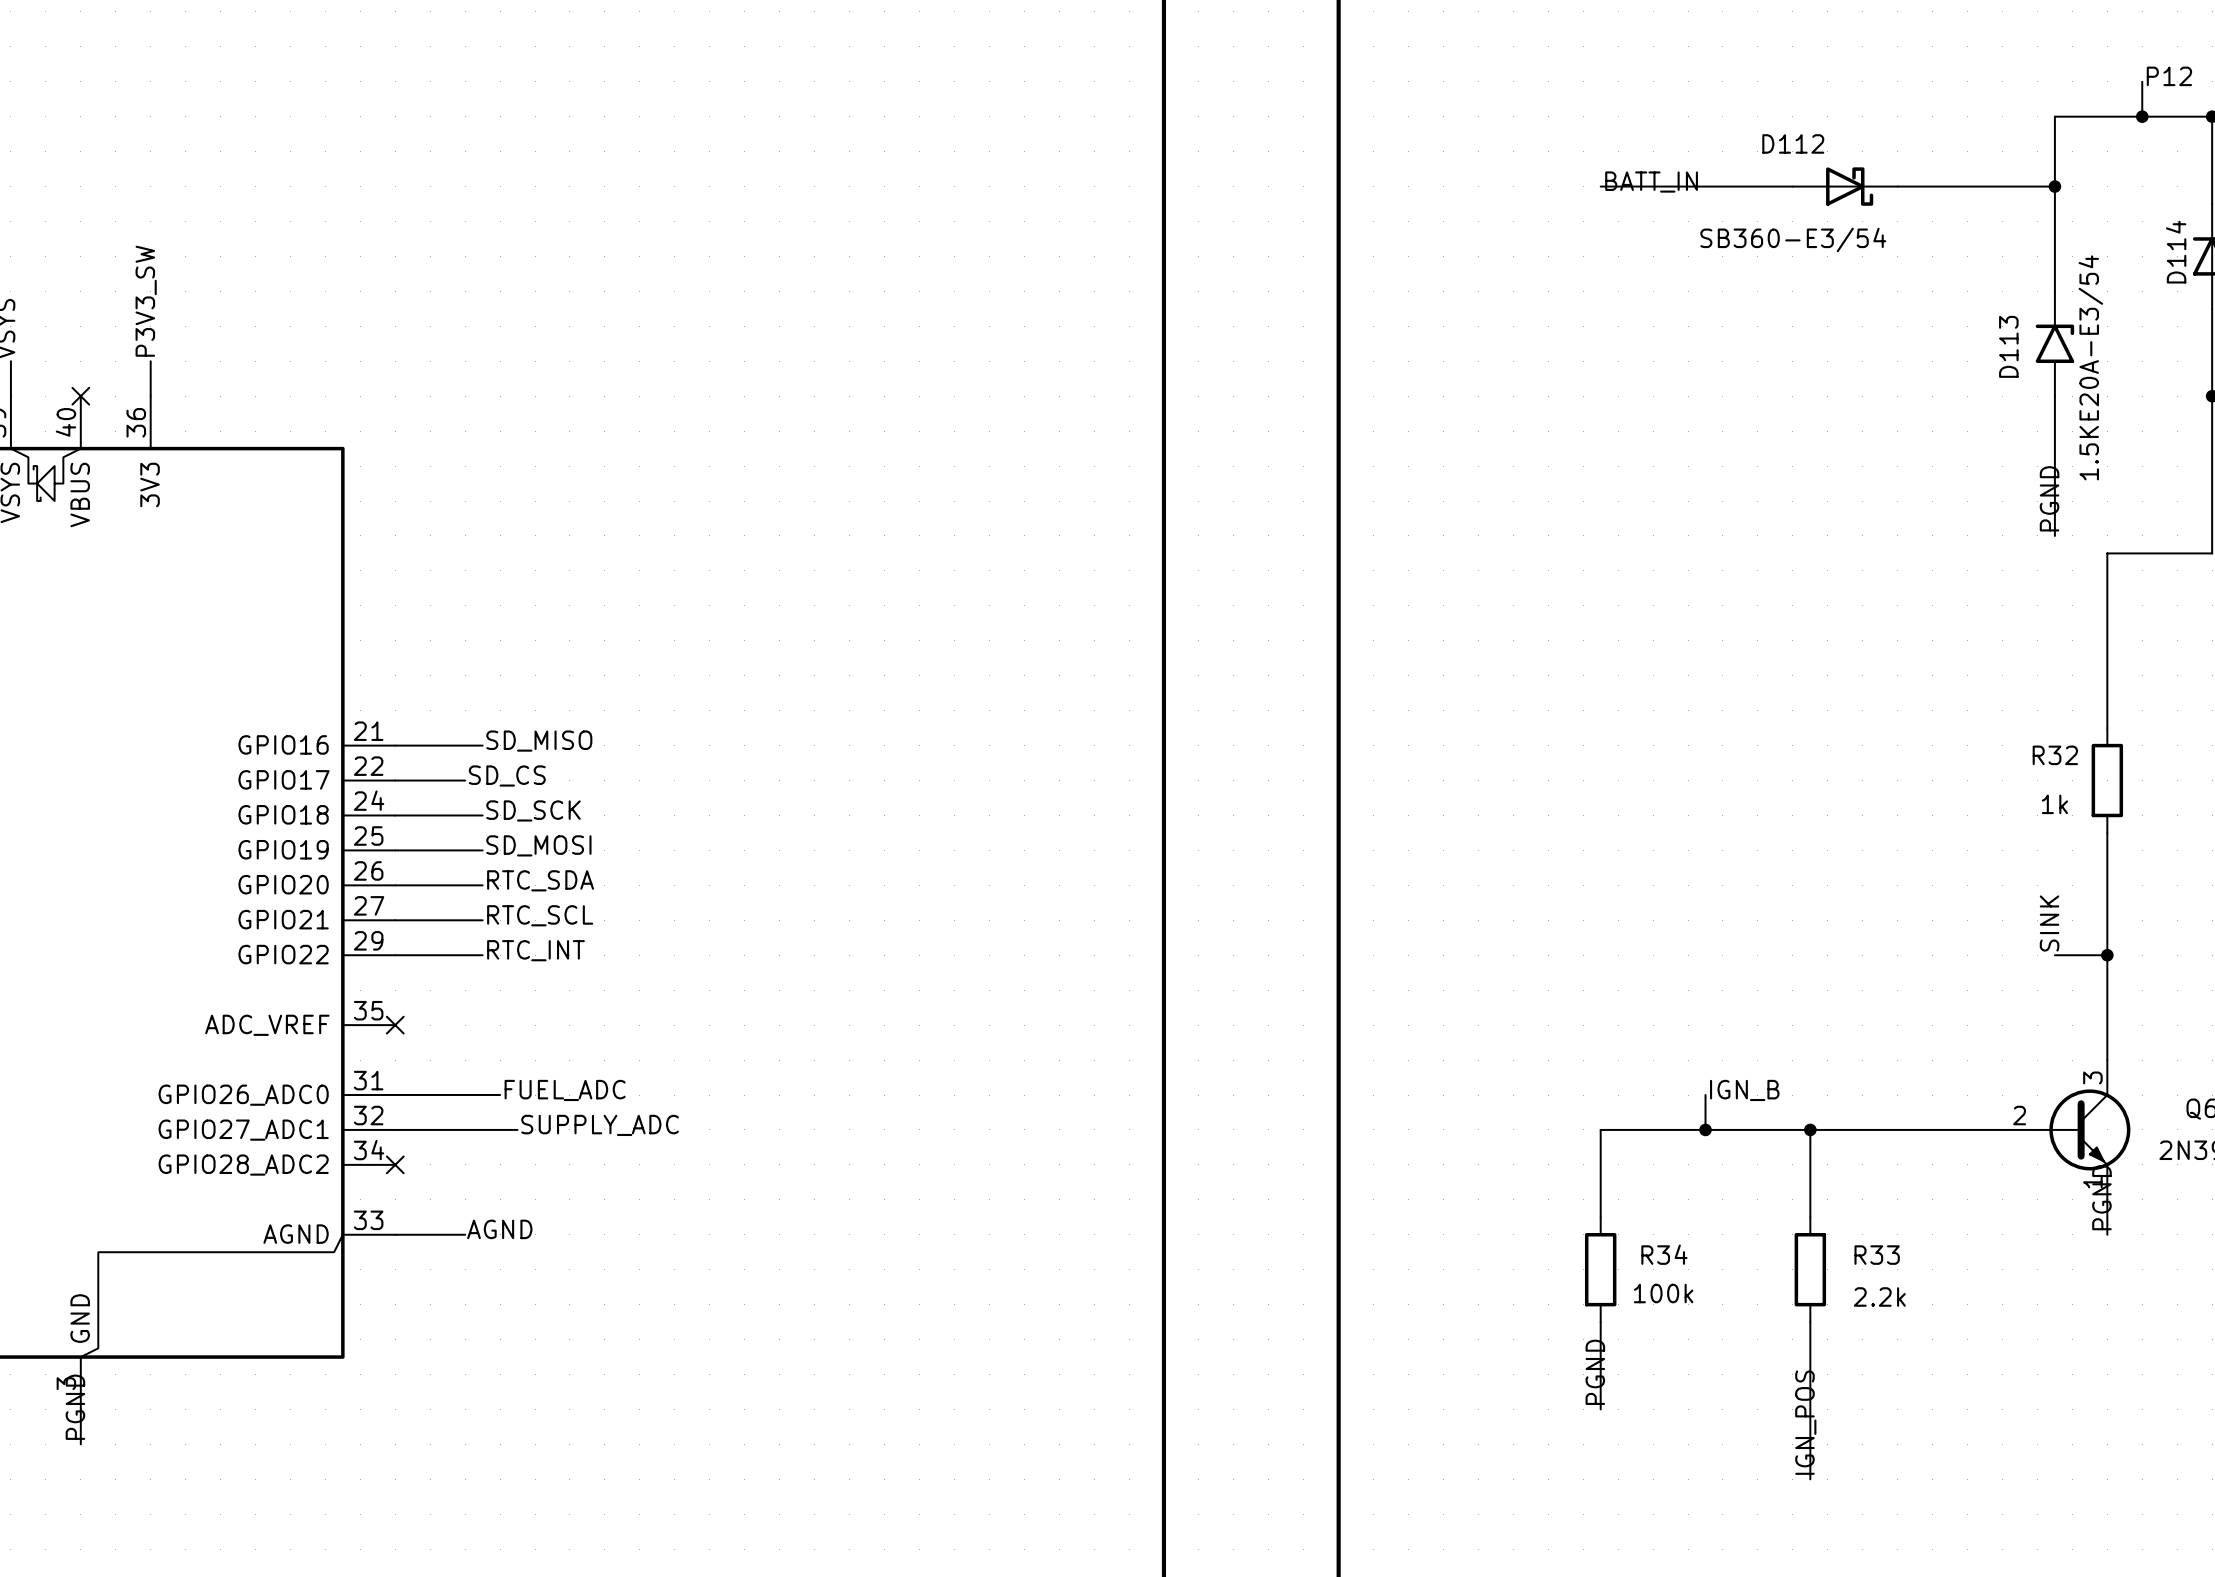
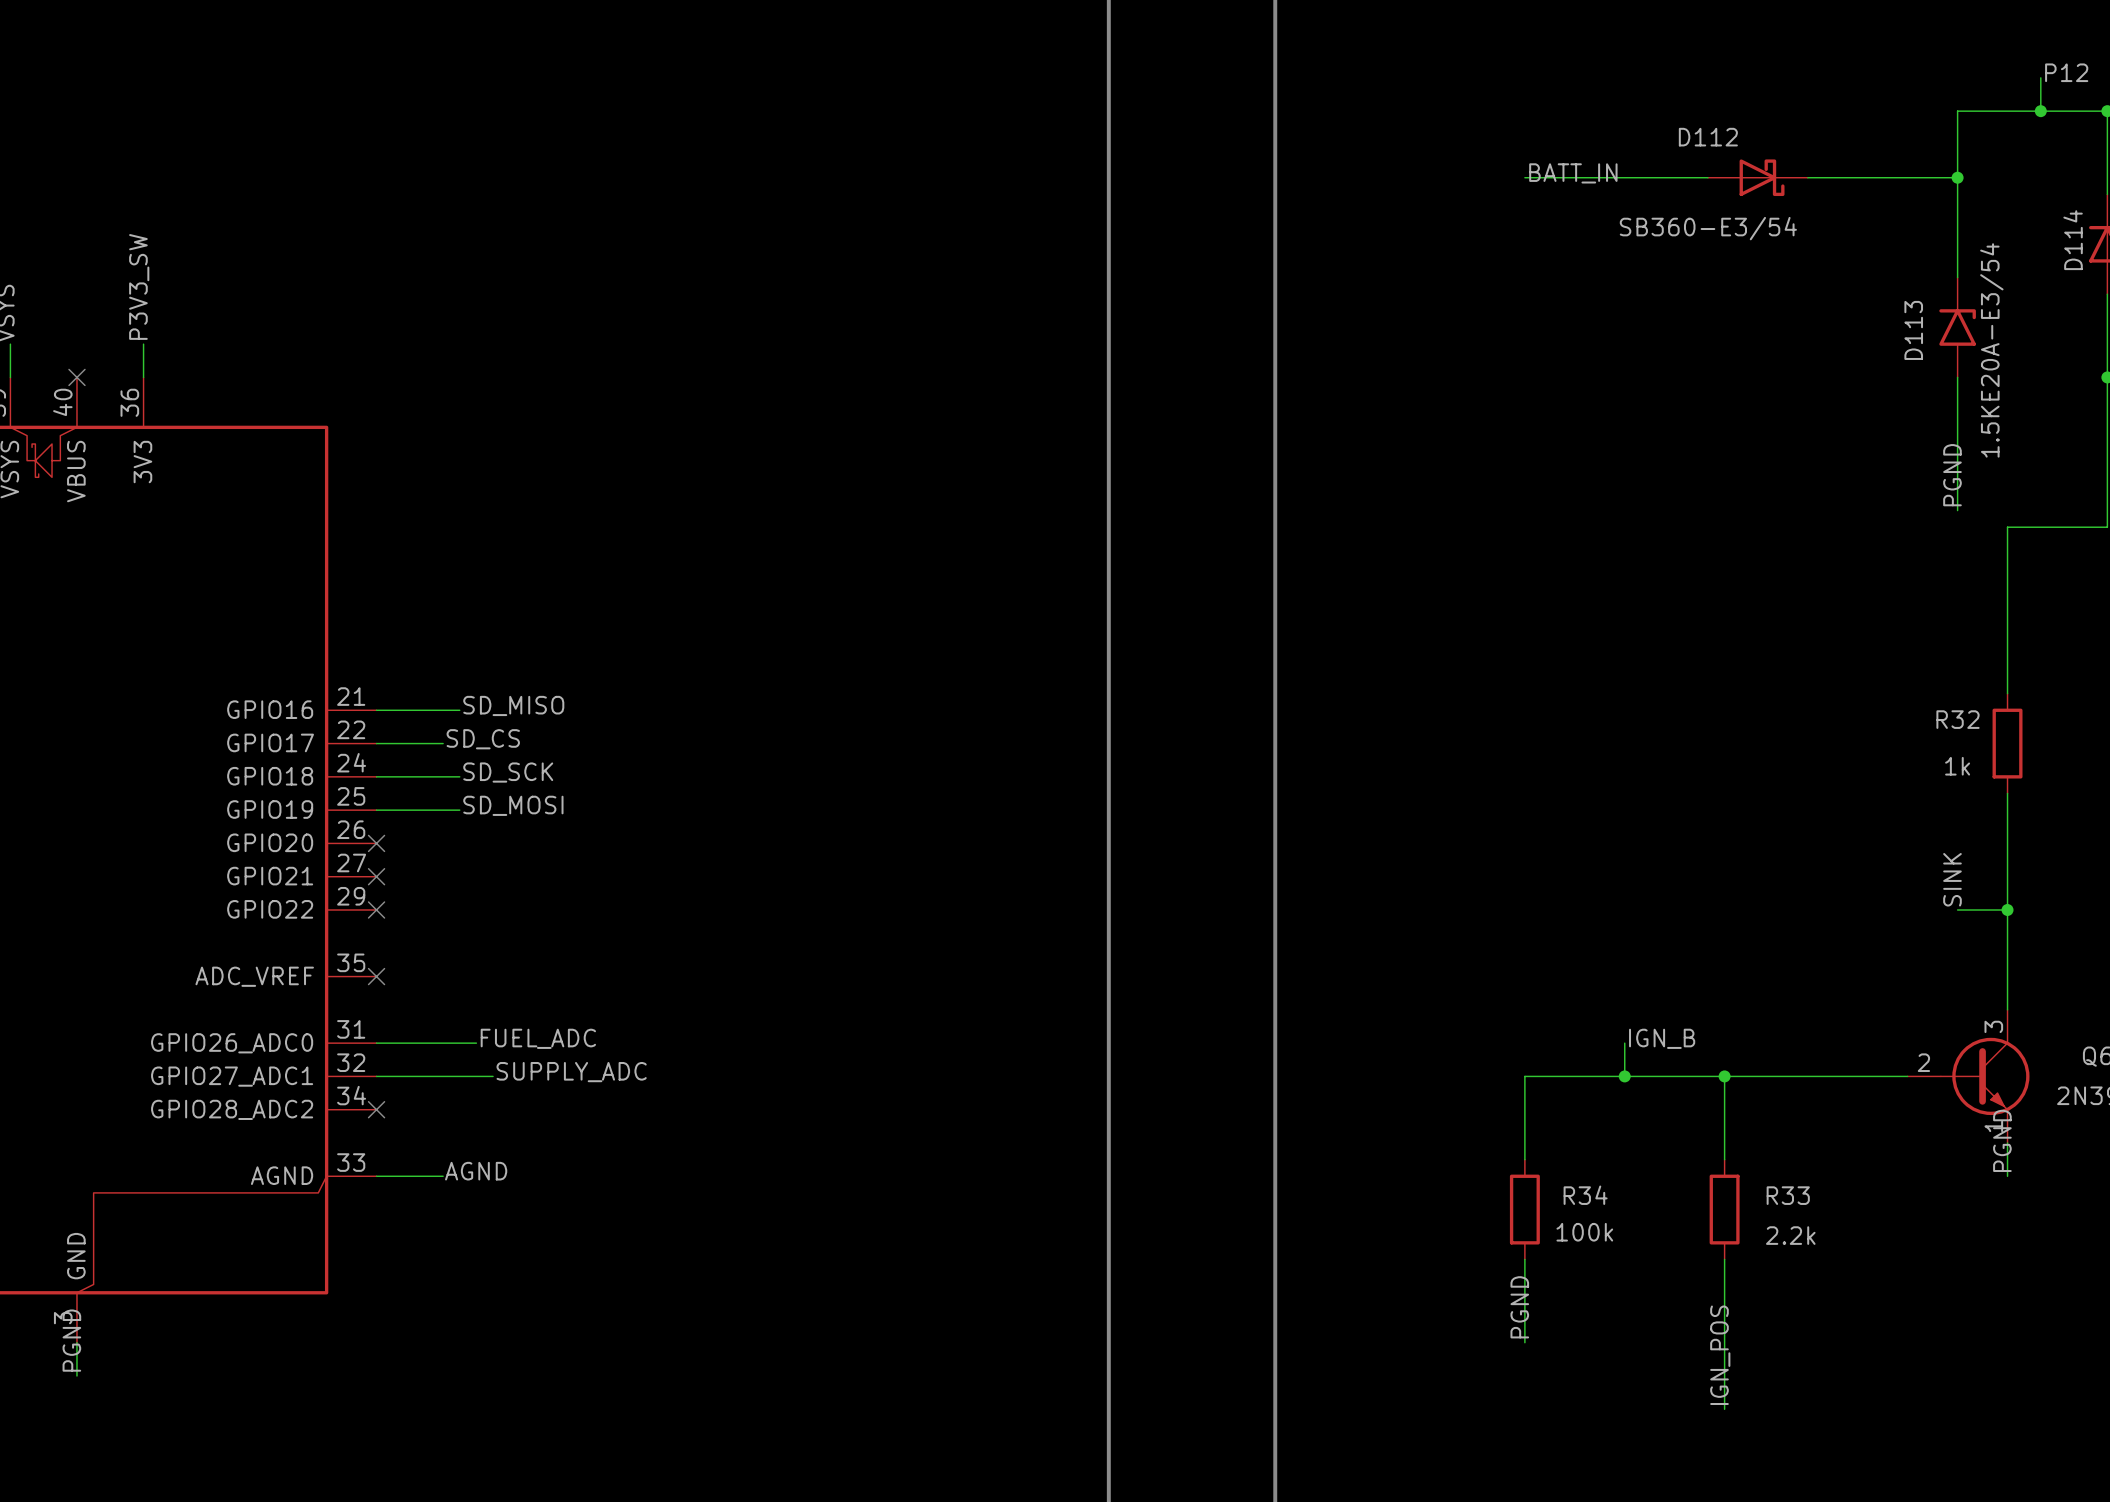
label: RTC_SDA (540, 880) -> none
wire: (395, 885) (482, 885) -> none
no-connect mark: none -> (376, 843)
label: RTC_SCL (540, 915) -> none
wire: (395, 920) (482, 920) -> none
no-connect mark: none -> (376, 876)
label: RTC_INT (535, 950) -> none
wire: (395, 955) (482, 955) -> none
no-connect mark: none -> (376, 909)

